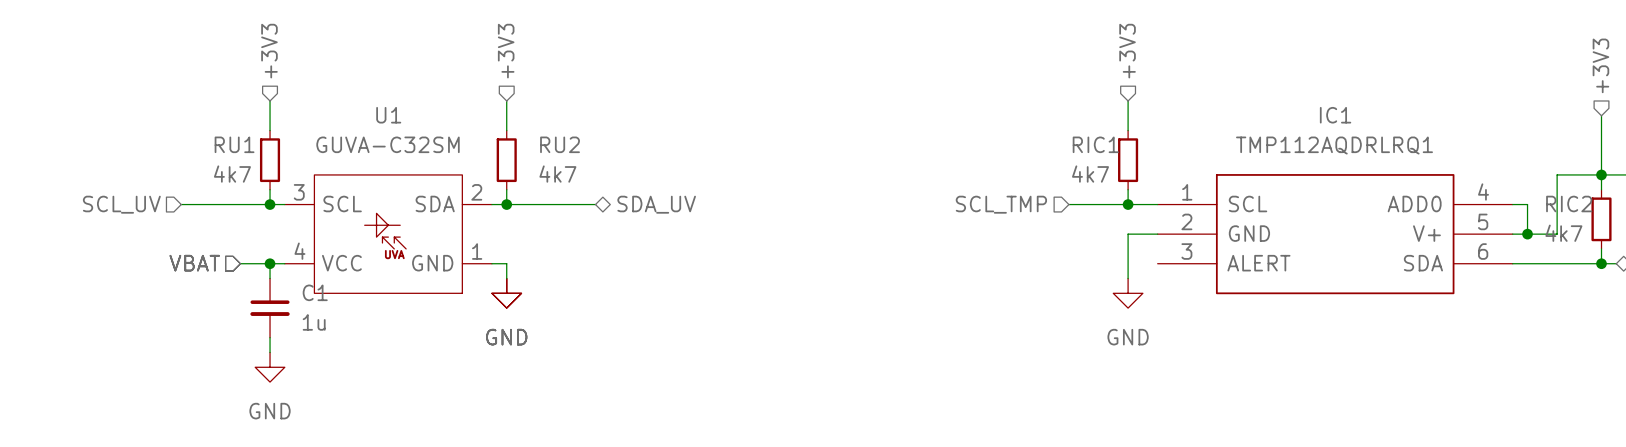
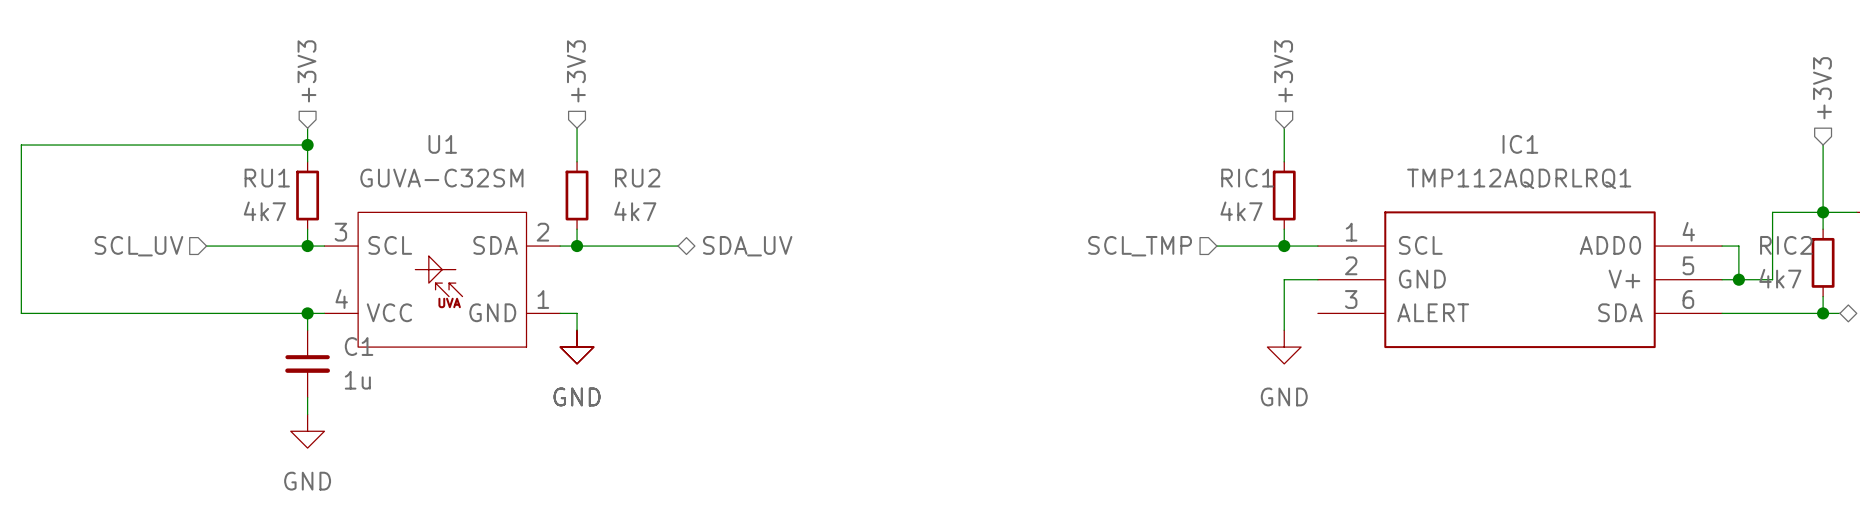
wire: none -> (307, 145) (21, 145) (21, 313) (273, 313)
junction: none -> (307, 145)
hierarchical label: VBAT (194, 263) -> none

